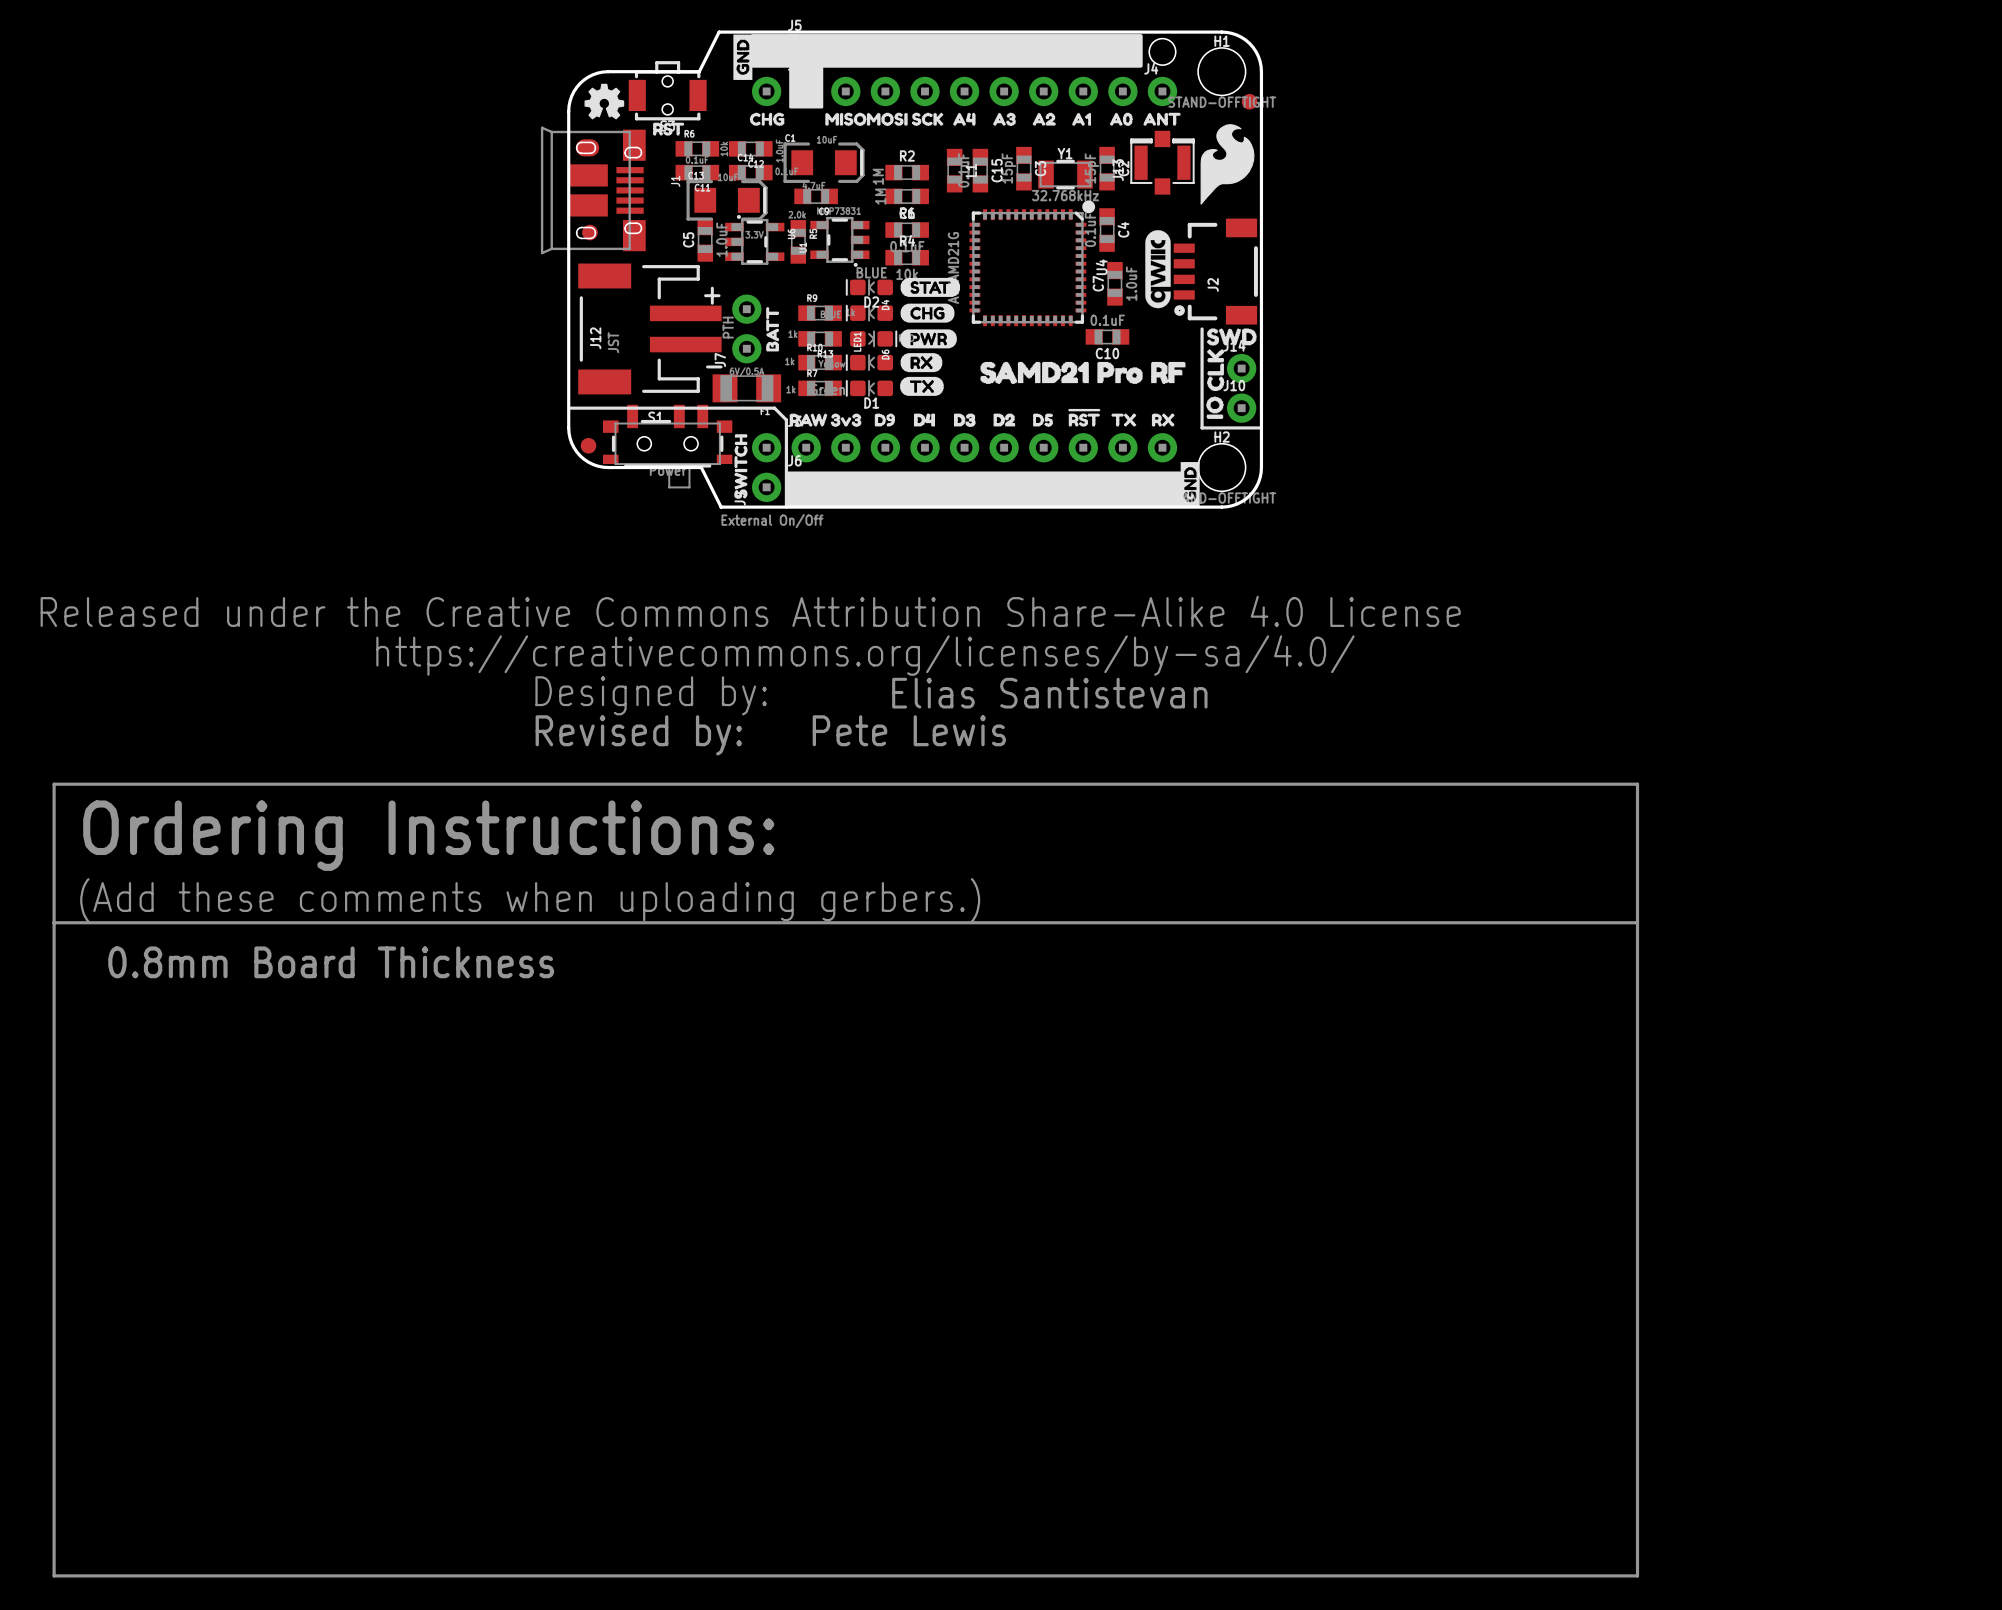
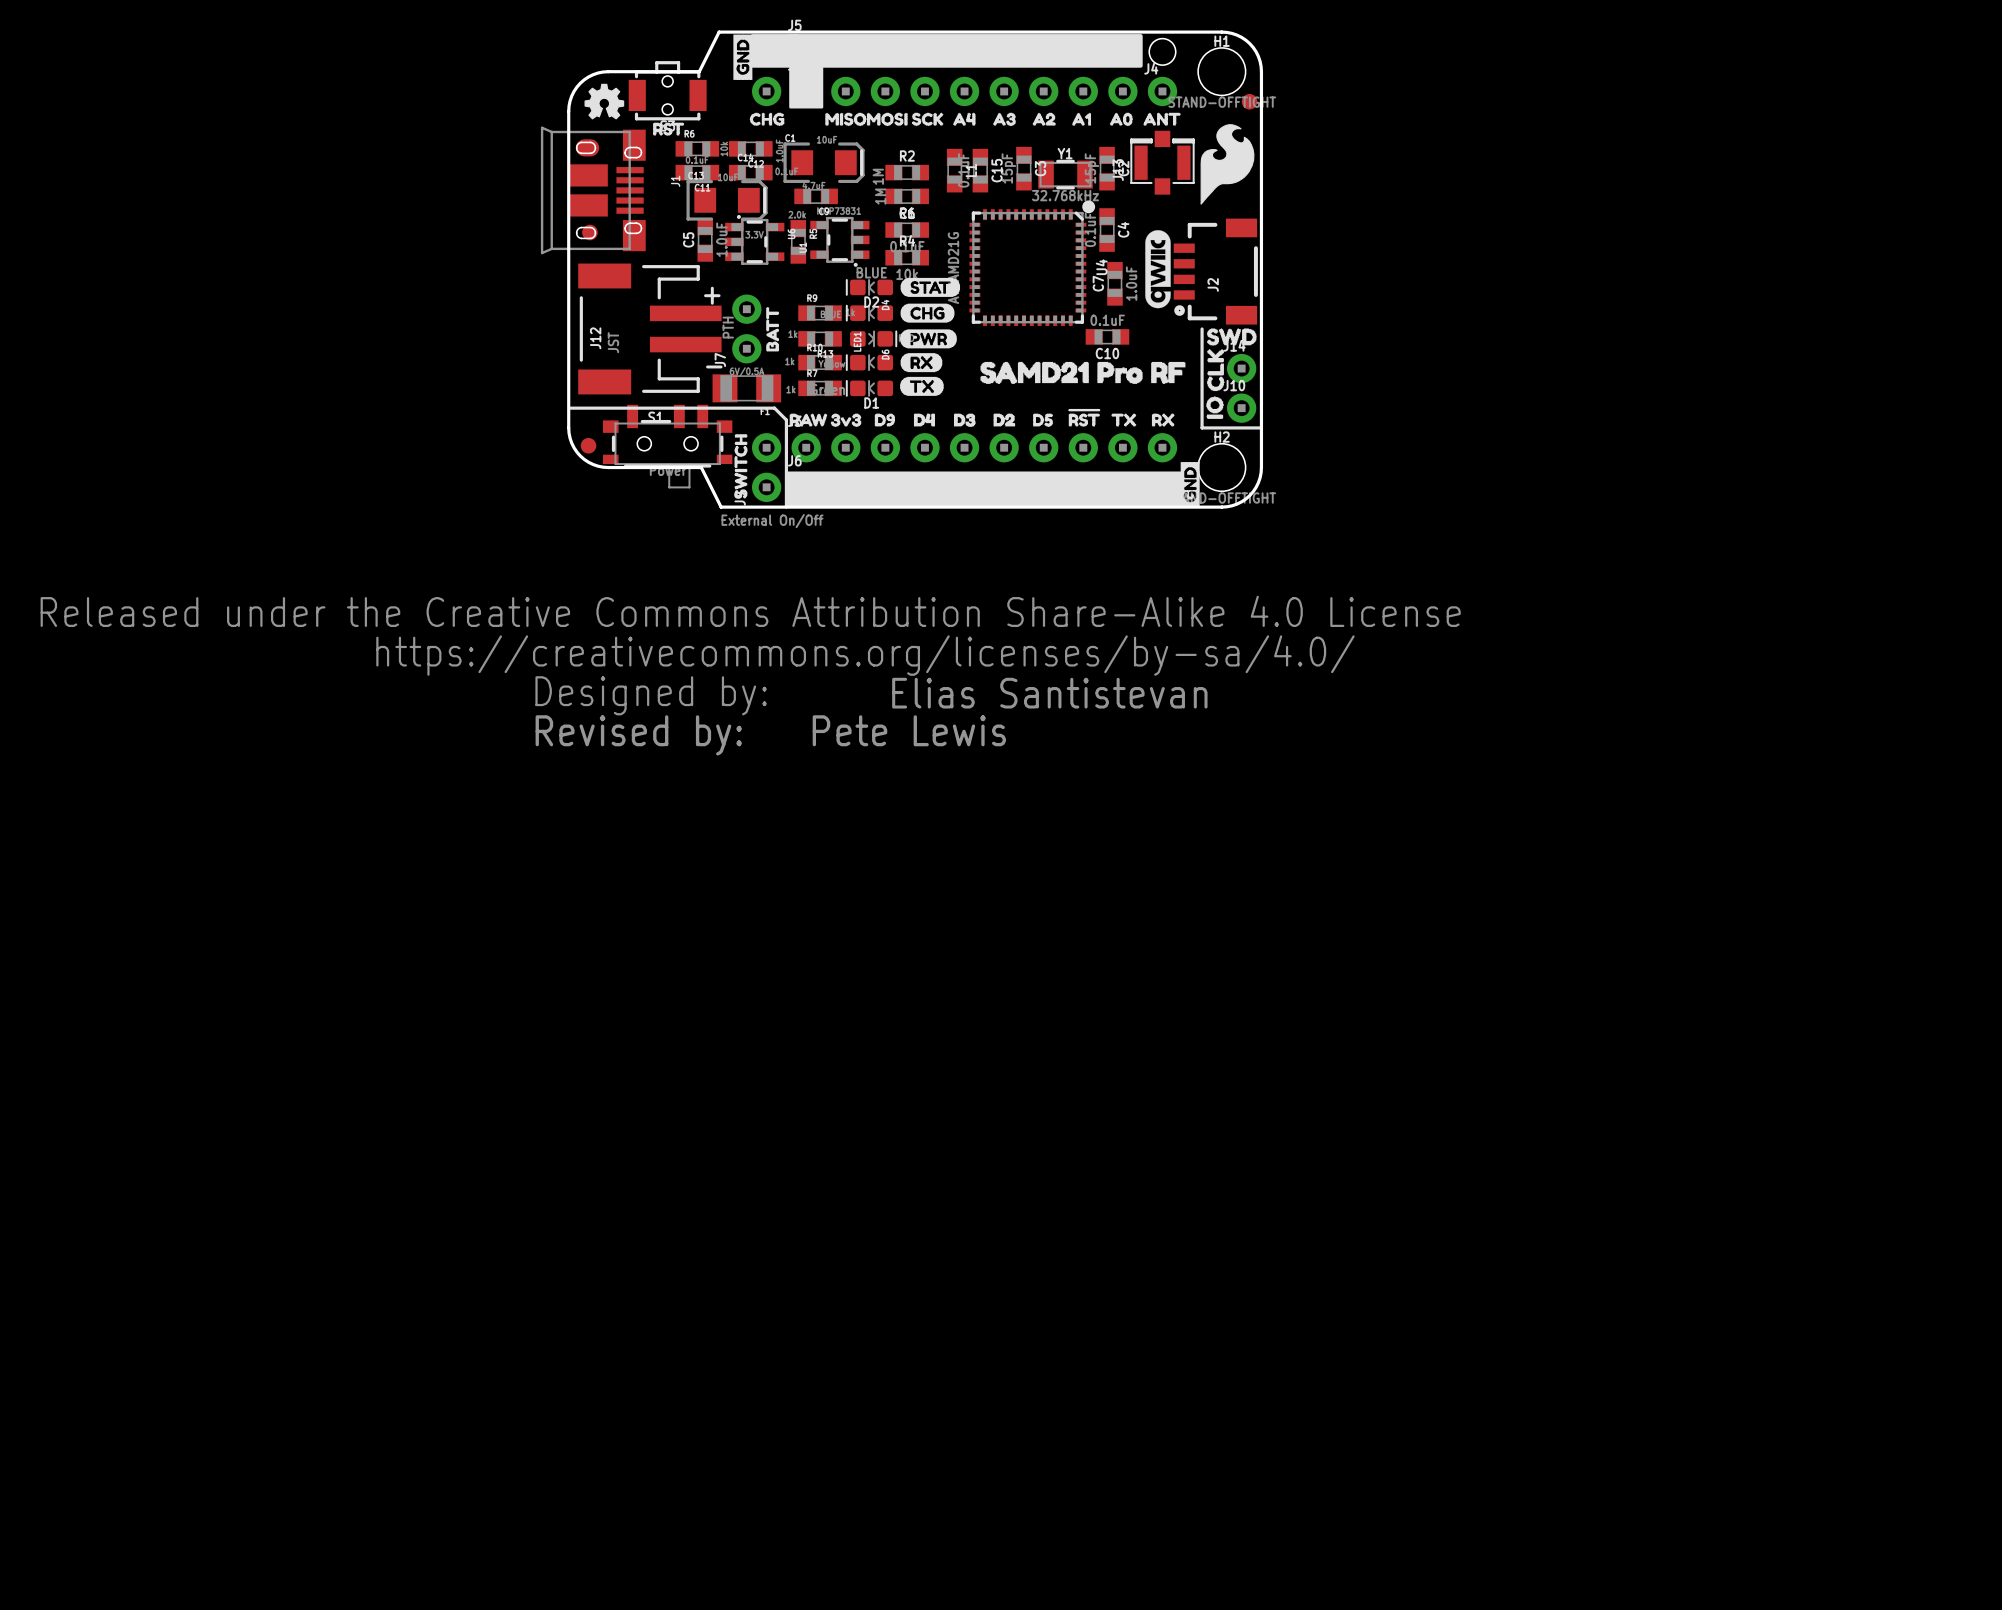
drawing: [52, 782, 1640, 1578] -> none
text: 0.8mm Board Thickness (331, 962) -> none

